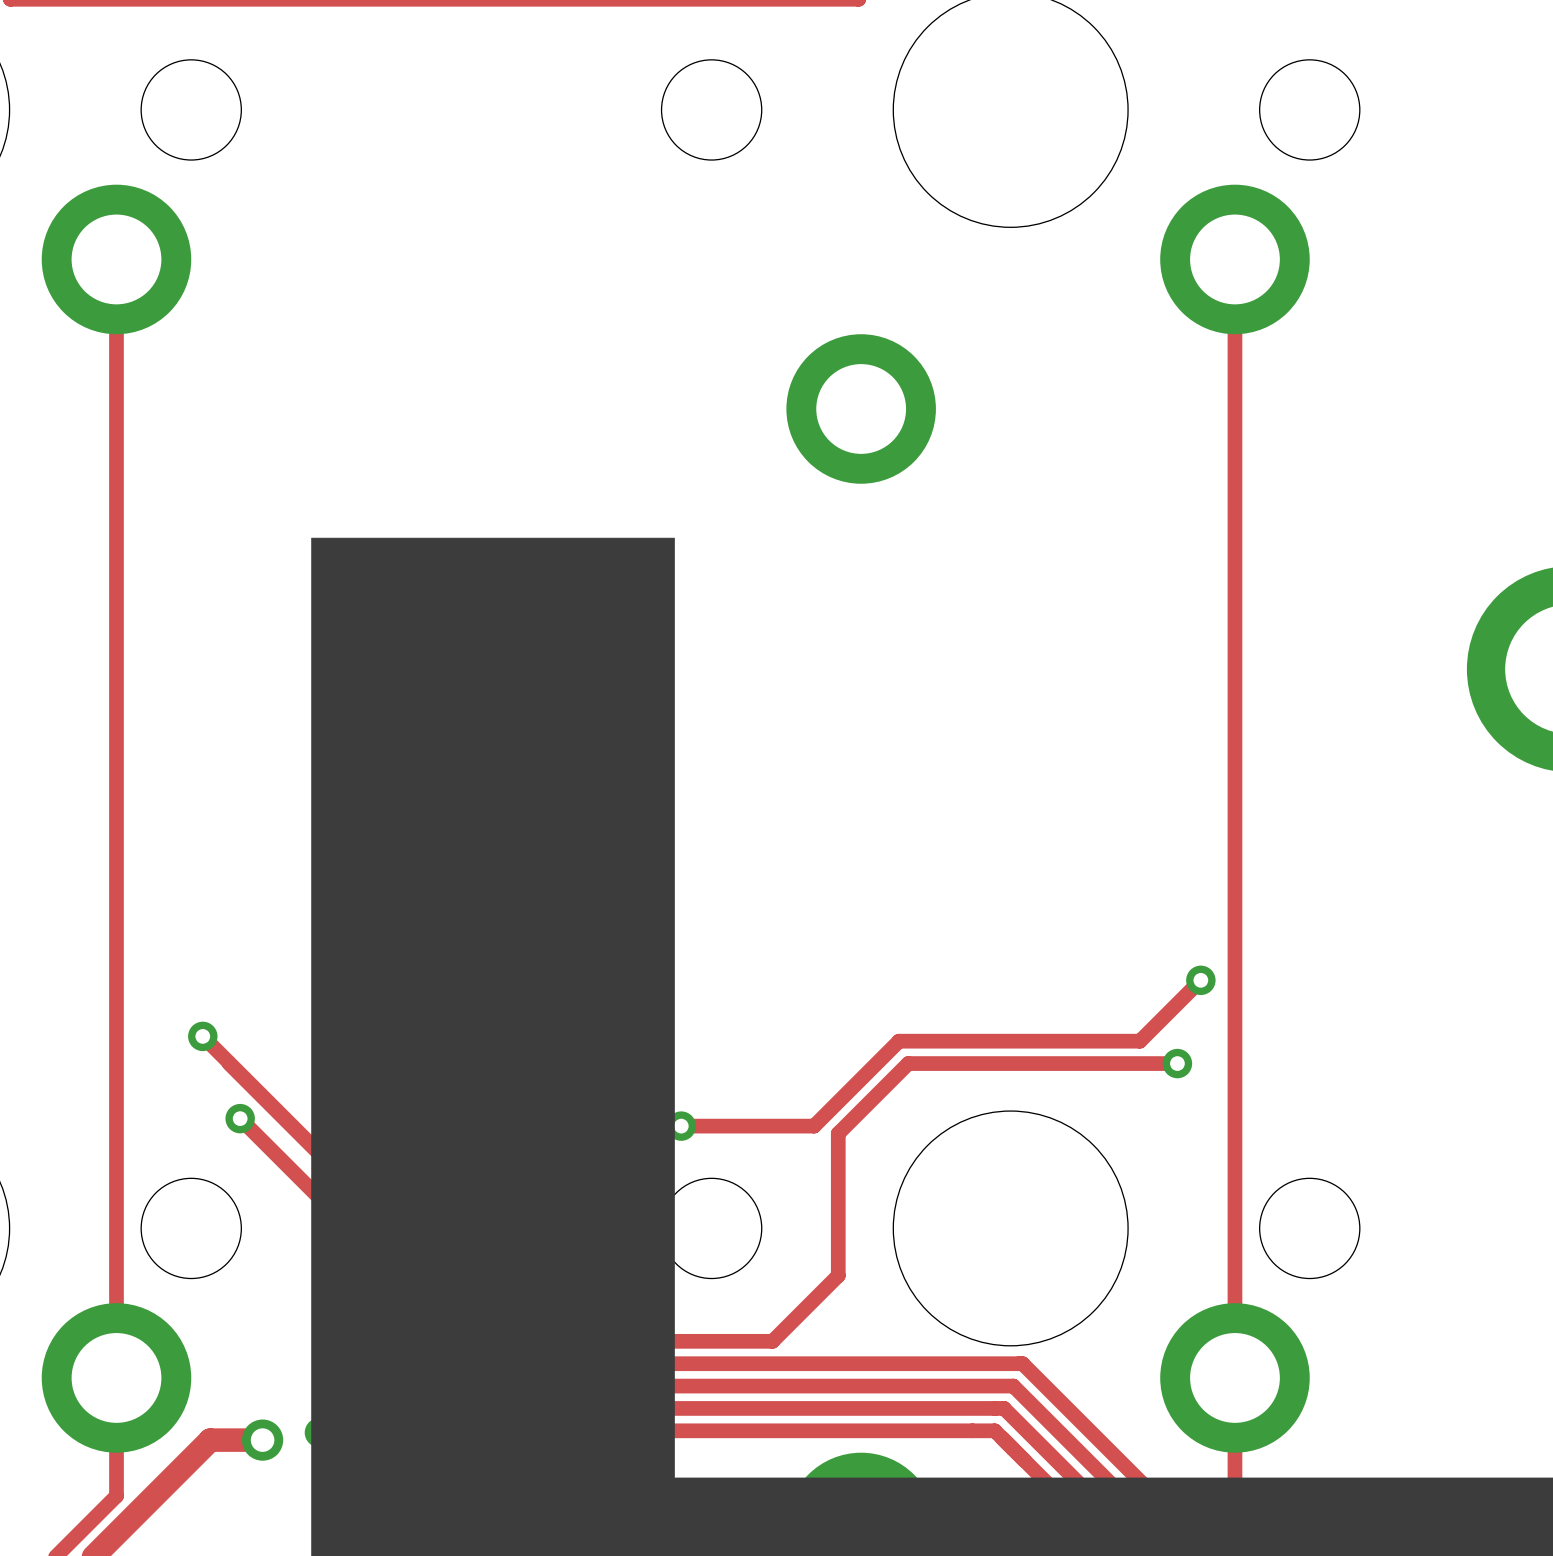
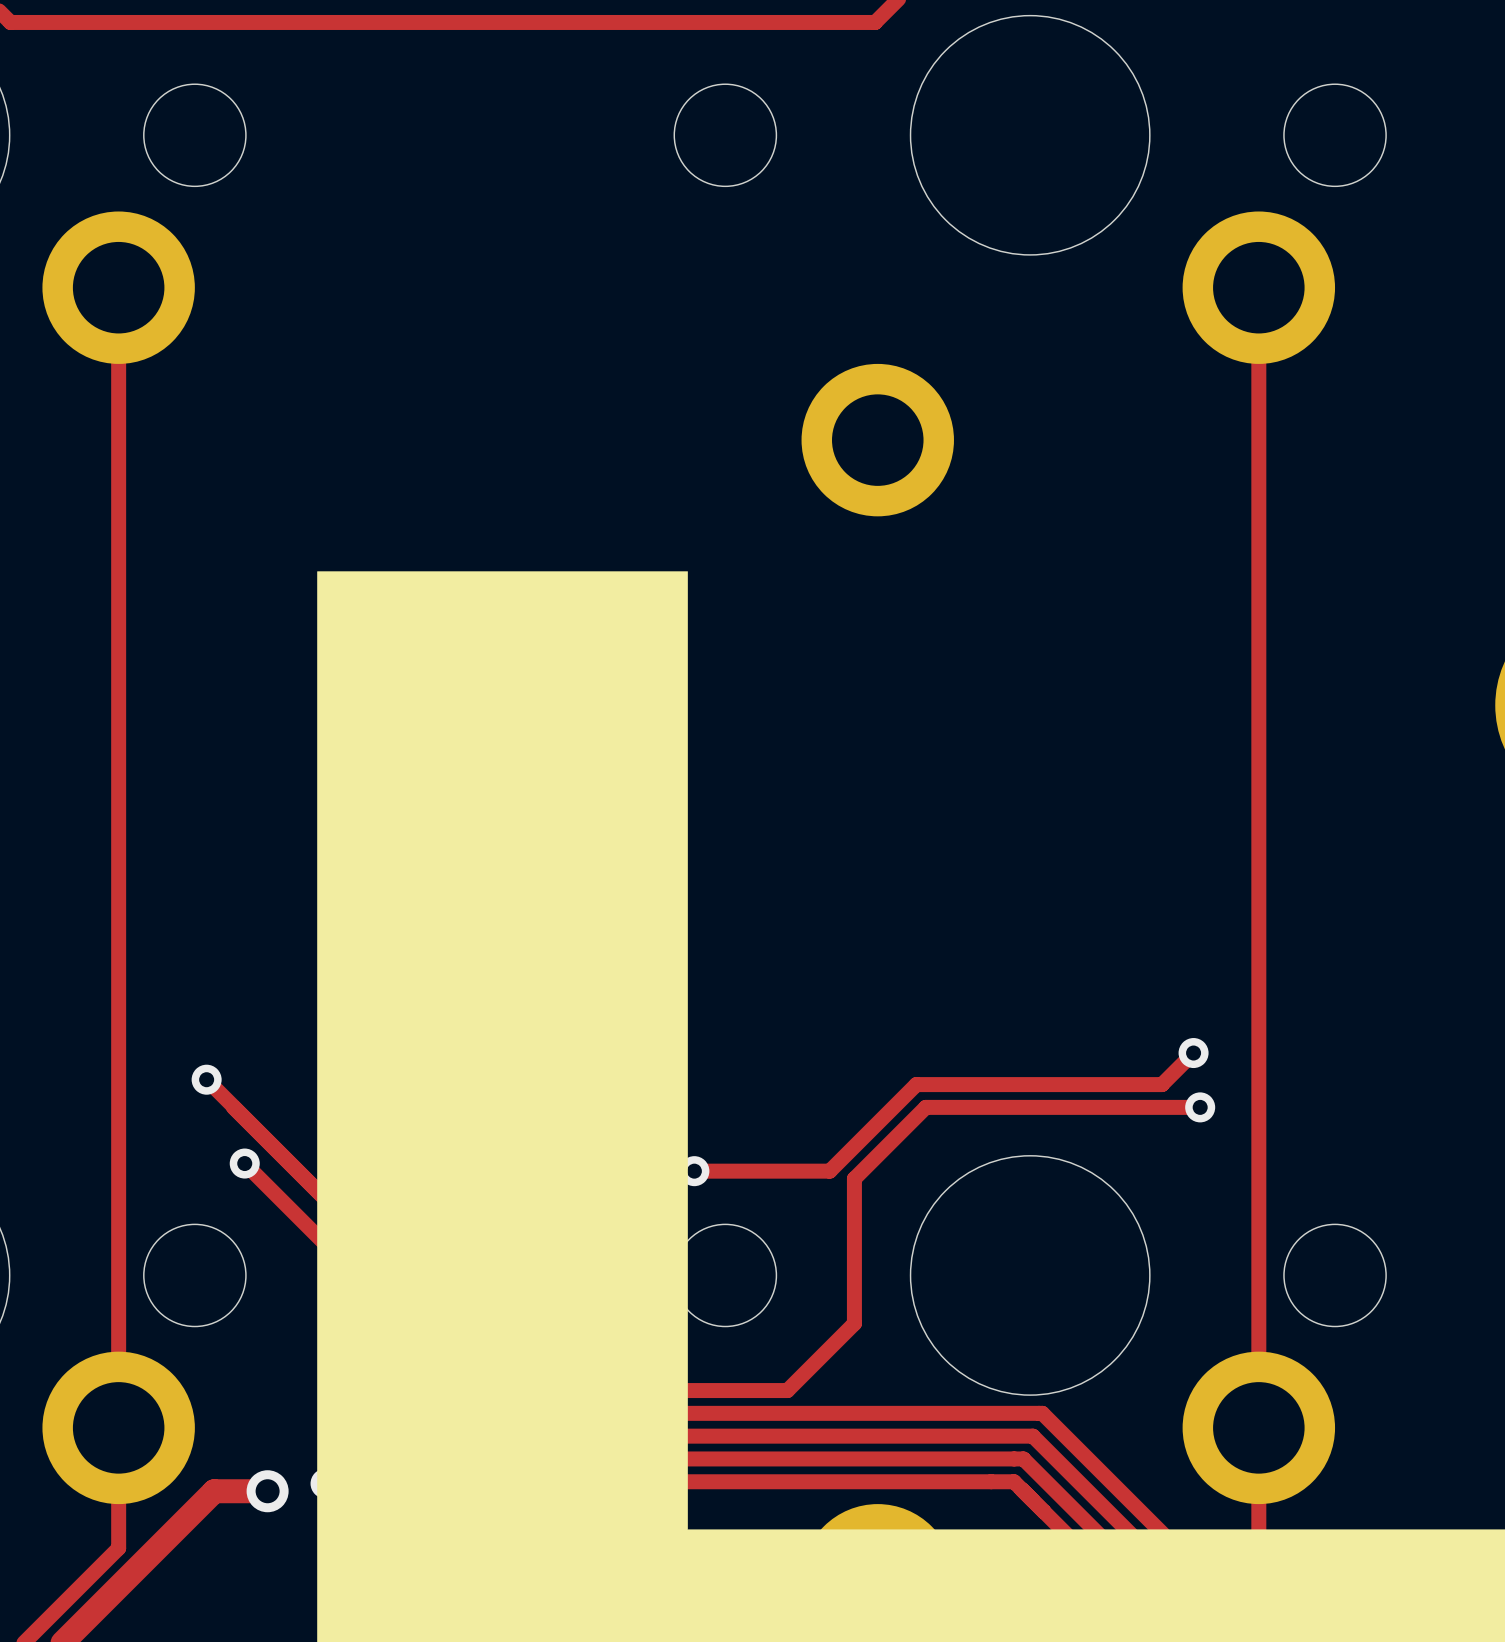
track: (1200, 980) (1170, 1010) -> none
via position: (1200, 980) -> (1193, 1053)

